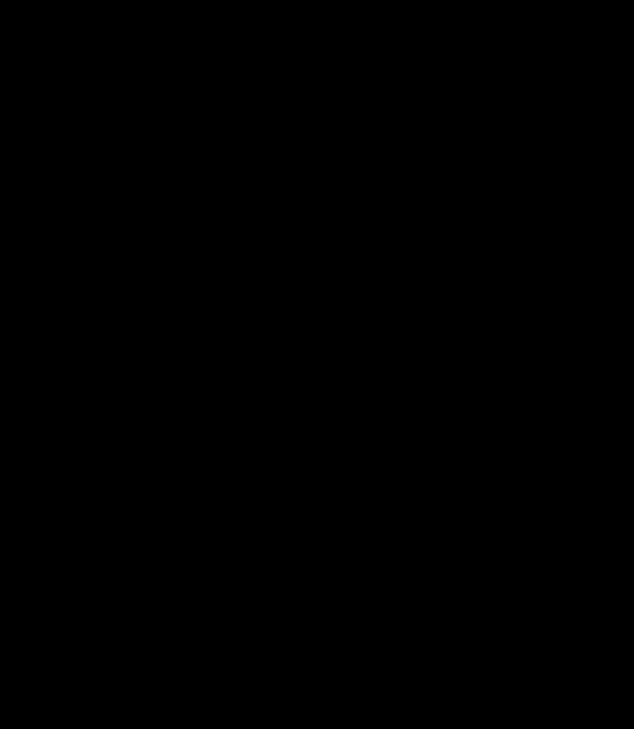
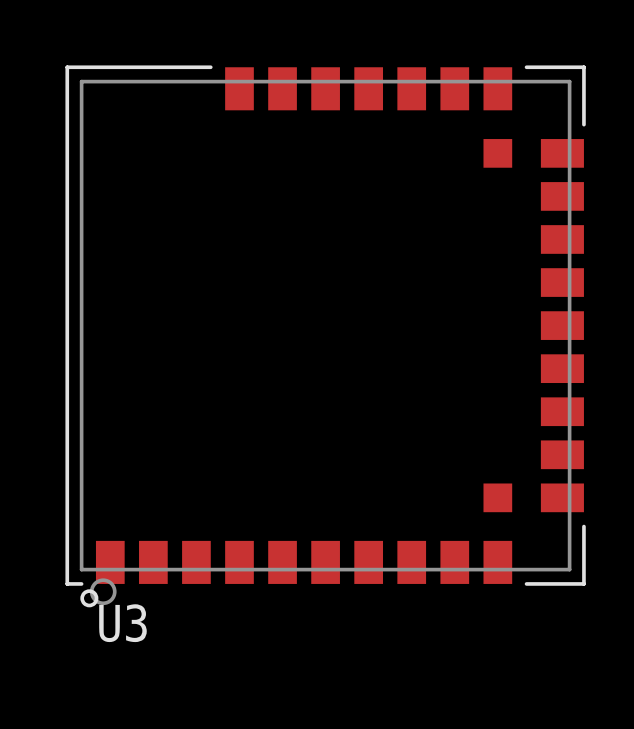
U3: none -> (325, 336)

